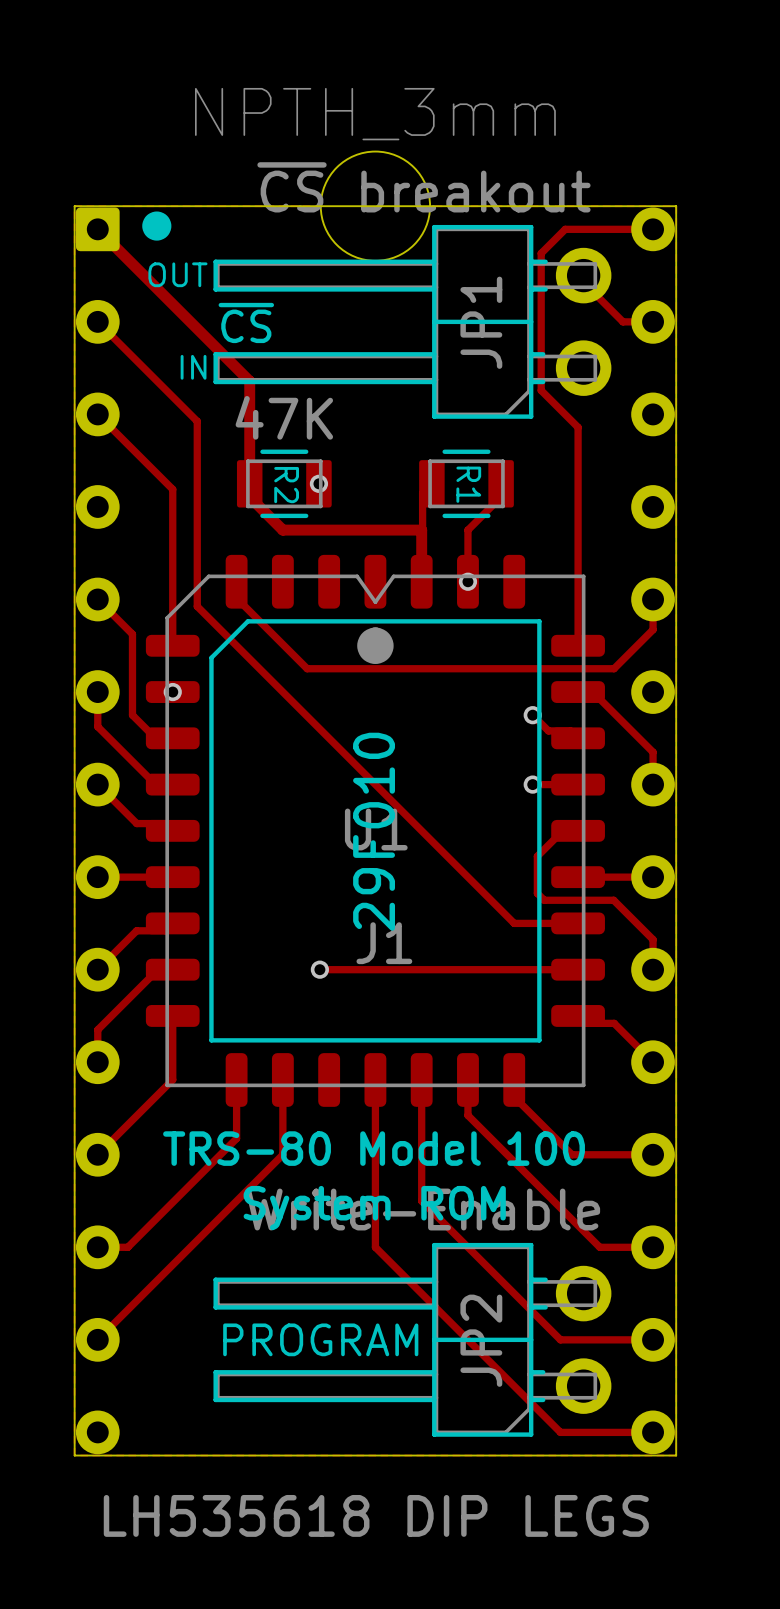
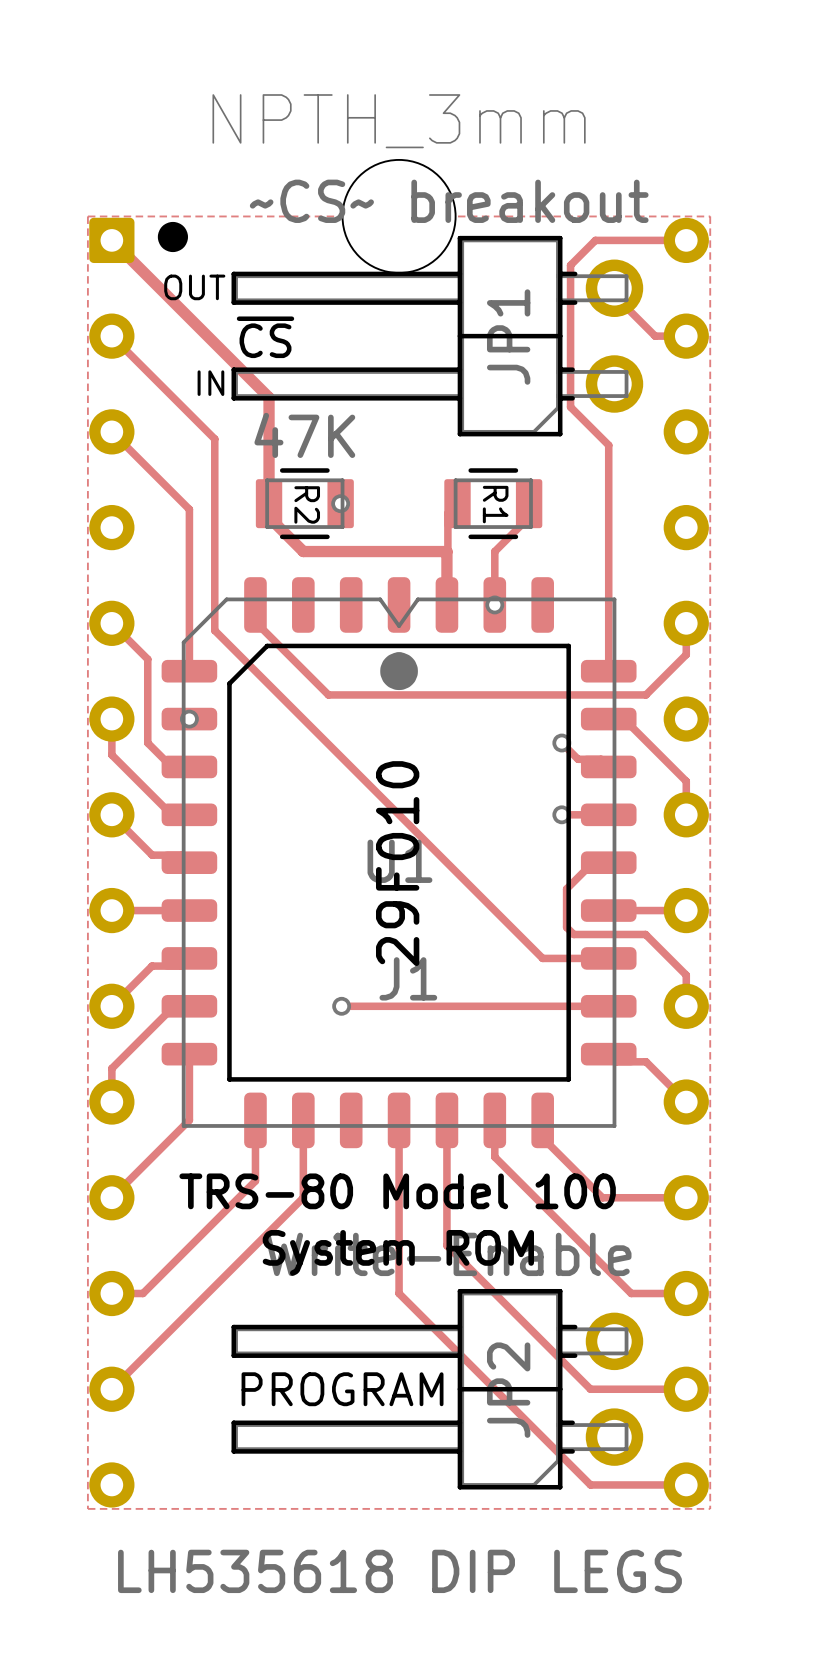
JP1 value: ~{CS} breakout (423, 187) -> ~CS~ breakout (449, 201)
board edge: (74, 206) (74, 1455) (676, 1455) (676, 206) (74, 206) -> none

